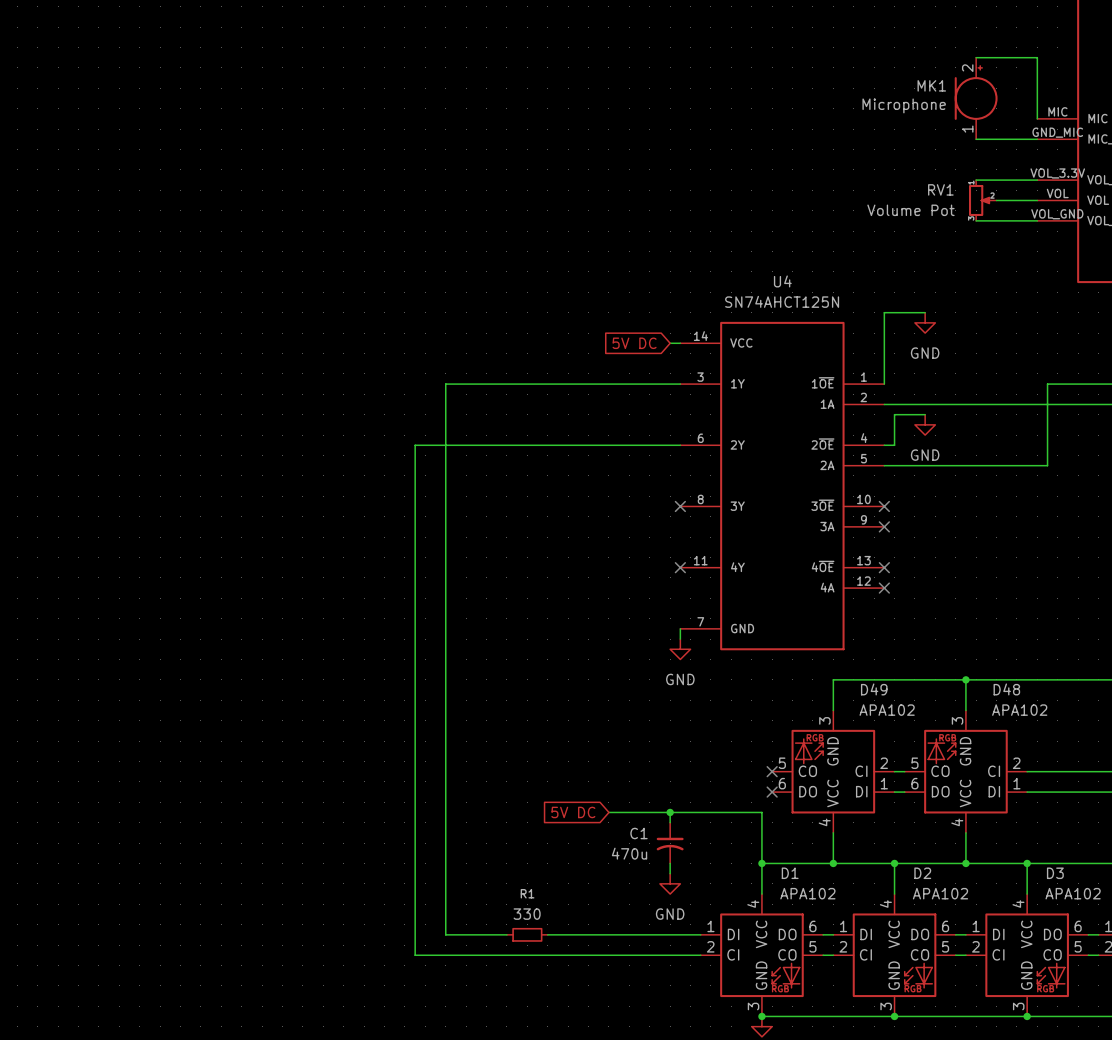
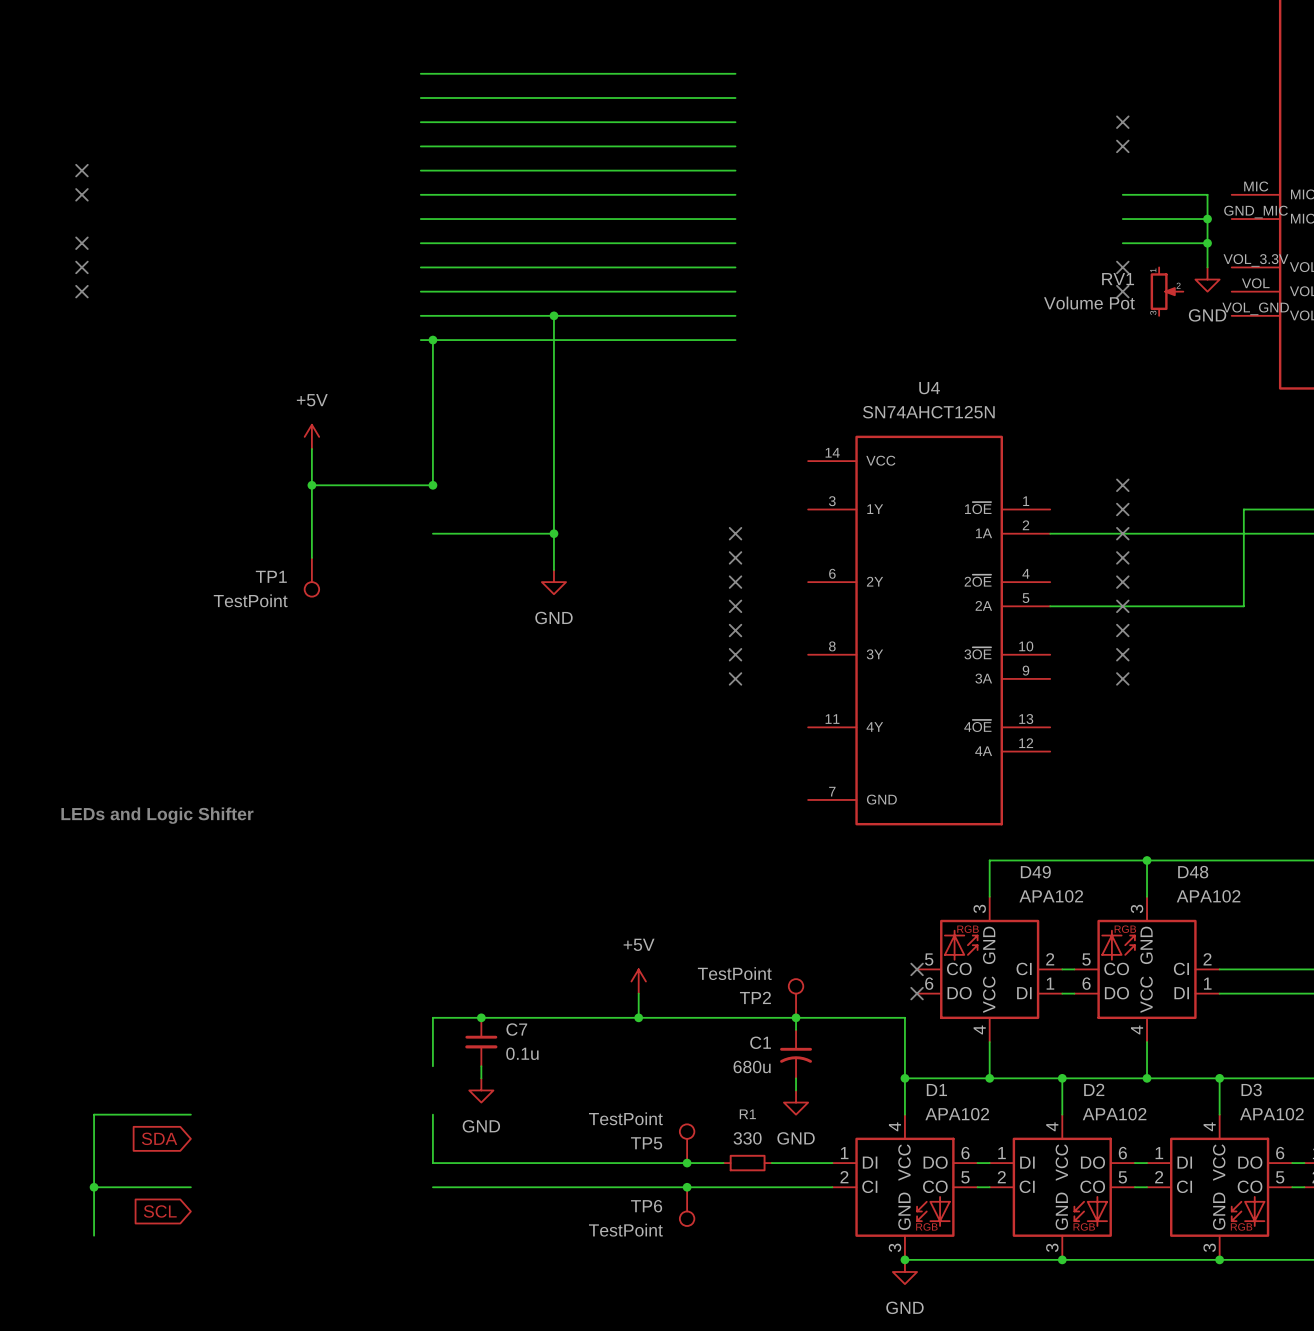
wire: none -> (420, 73) (735, 73)
wire: none -> (420, 98) (735, 98)
wire: none -> (420, 122) (735, 122)
no-connect mark: none -> (1122, 122)
wire: (976, 57) (1037, 57) (1037, 118) -> none
wire: none -> (420, 146) (735, 146)
no-connect mark: none -> (1122, 146)
no-connect mark: none -> (81, 170)
wire: none -> (420, 170) (735, 170)
MK1: Microphone (976, 98) -> none
no-connect mark: none -> (81, 194)
wire: none -> (420, 194) (735, 194)
wire: none -> (1122, 194) (1207, 194) (1207, 267)
wire: none -> (420, 219) (735, 219)
wire: none -> (1122, 219) (1159, 219)
wire: (1016, 139) (1037, 139) -> none
junction: none -> (1207, 219)
no-connect mark: none -> (81, 243)
wire: none -> (420, 243) (735, 243)
wire: none -> (1122, 243) (1207, 243)
junction: none -> (1207, 243)
no-connect mark: none -> (81, 267)
wire: none -> (420, 267) (735, 267)
no-connect mark: none -> (1122, 267)
wire: (976, 180) (1037, 180) -> none
power symbol: none -> GND (1207, 279)
no-connect mark: none -> (81, 291)
wire: none -> (420, 291) (735, 291)
no-connect mark: none -> (1122, 291)
wire: (996, 200) (1037, 200) -> none
wire: none -> (420, 315) (735, 315)
wire: none -> (553, 315) (553, 570)
junction: none -> (553, 315)
wire: (976, 220) (1037, 220) -> none
wire: none -> (420, 340) (735, 340)
wire: none -> (432, 340) (432, 485) (311, 485)
junction: none -> (432, 340)
wire: (925, 312) (884, 312) (884, 384) -> none
power symbol: none -> +5V (311, 436)
power symbol: GND (925, 322) -> none
wire: none -> (311, 448) (311, 557)
global label: 5V DC (634, 343) -> none
wire: (670, 343) (680, 343) -> none
junction: none -> (311, 485)
junction: none -> (432, 485)
no-connect mark: none -> (1122, 485)
wire: (680, 384) (445, 384) (445, 934) -> (432, 1114) (432, 1163) (529, 1163)
no-connect mark: none -> (1122, 509)
wire: none -> (432, 533) (553, 533)
junction: none -> (553, 533)
no-connect mark: none -> (735, 533)
no-connect mark: none -> (1122, 533)
wire: (925, 414) (894, 414) (894, 445) (884, 445) -> none
no-connect mark: none -> (735, 557)
power symbol: GND (925, 424) -> none
no-connect mark: none -> (1122, 557)
TP1: none -> TestPoint (311, 577)
power symbol: none -> GND (553, 582)
no-connect mark: none -> (735, 582)
wire: (680, 445) (415, 445) (415, 955) -> (432, 1187) (493, 1187)
no-connect mark: none -> (1122, 582)
no-connect mark: none -> (735, 606)
no-connect mark: none -> (1122, 606)
no-connect mark: none -> (735, 630)
no-connect mark: none -> (1122, 630)
no-connect mark: none -> (735, 654)
no-connect mark: (680, 506) -> none
no-connect mark: (884, 506) -> none
no-connect mark: none -> (1122, 654)
no-connect mark: none -> (735, 678)
no-connect mark: (884, 526) -> none
no-connect mark: none -> (1122, 678)
no-connect mark: (680, 567) -> none
no-connect mark: (884, 567) -> none
no-connect mark: (884, 588) -> none
wire: (680, 628) (680, 639) -> none
text: none -> LEDs and Logic Shifter (157, 815)
power symbol: GND (680, 649) -> none
power symbol: none -> +5V (638, 981)
wire: none -> (638, 993) (638, 1017)
TP2: none -> TestPoint (796, 998)
junction: none -> (481, 1017)
junction: none -> (638, 1017)
global label: 5V DC (573, 812) -> none
wire: none -> (723, 1017) (432, 1017) (432, 1066)
C7: none -> 0.1u (481, 1042)
wire: none -> (481, 1066) (481, 1078)
C1 value: 470u (629, 853) -> 680u (752, 1066)
power symbol: none -> GND (481, 1090)
wire: none -> (190, 1114) (94, 1114) (94, 1235)
global label: none -> SDA (159, 1138)
TP5: none -> TestPoint (687, 1143)
R1 position: (527, 934) -> (747, 1163)
junction: none -> (687, 1163)
wire: (608, 934) (649, 934) -> (602, 1163) (650, 1163)
wire: none -> (94, 1187) (190, 1187)
junction: none -> (94, 1187)
junction: none -> (687, 1187)
TP6: none -> TestPoint (687, 1206)
global label: none -> SCL (160, 1211)

